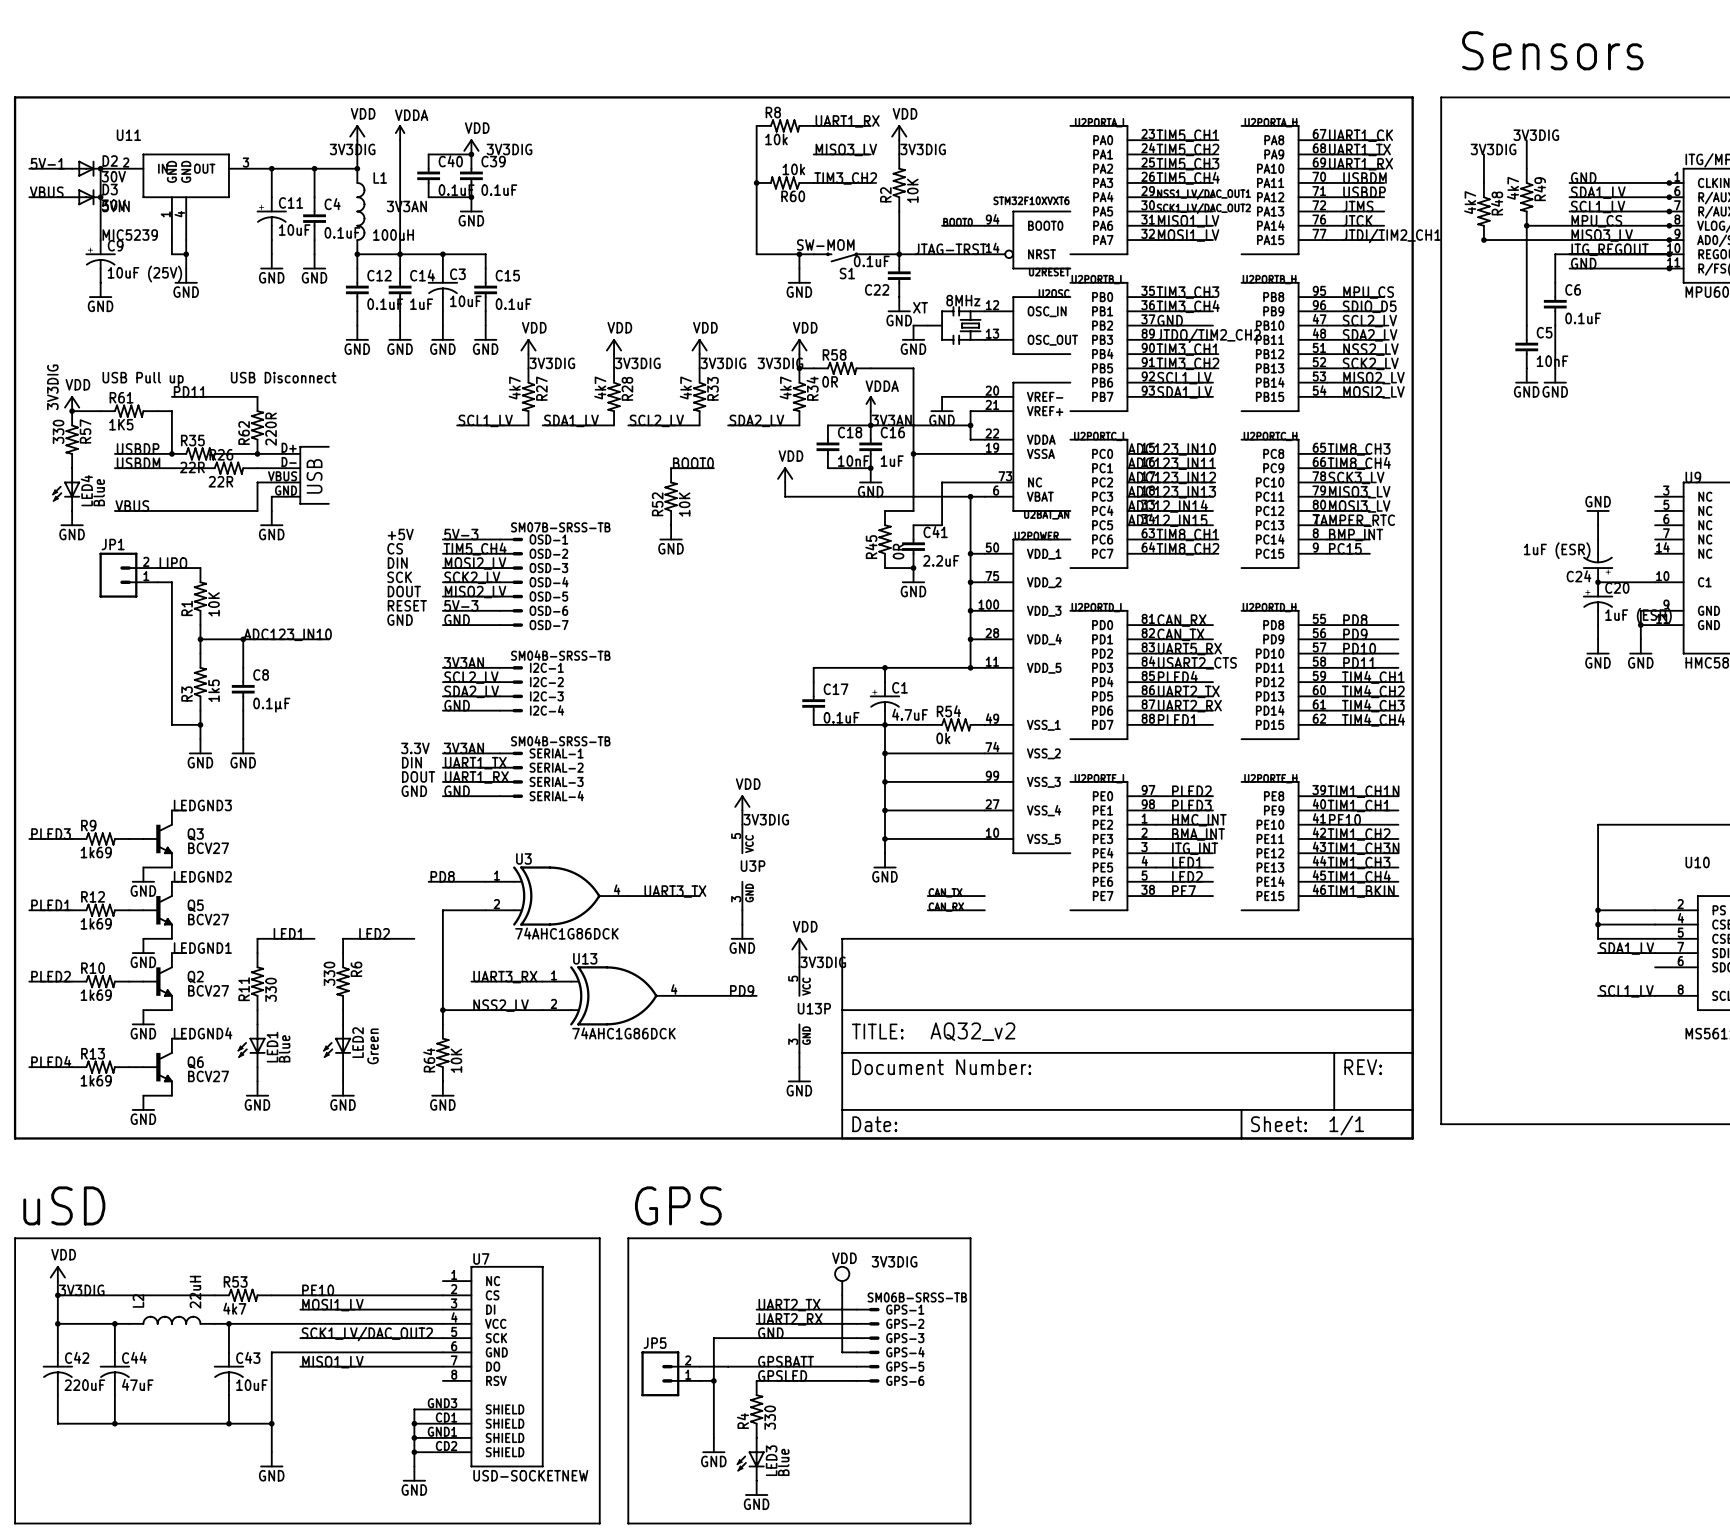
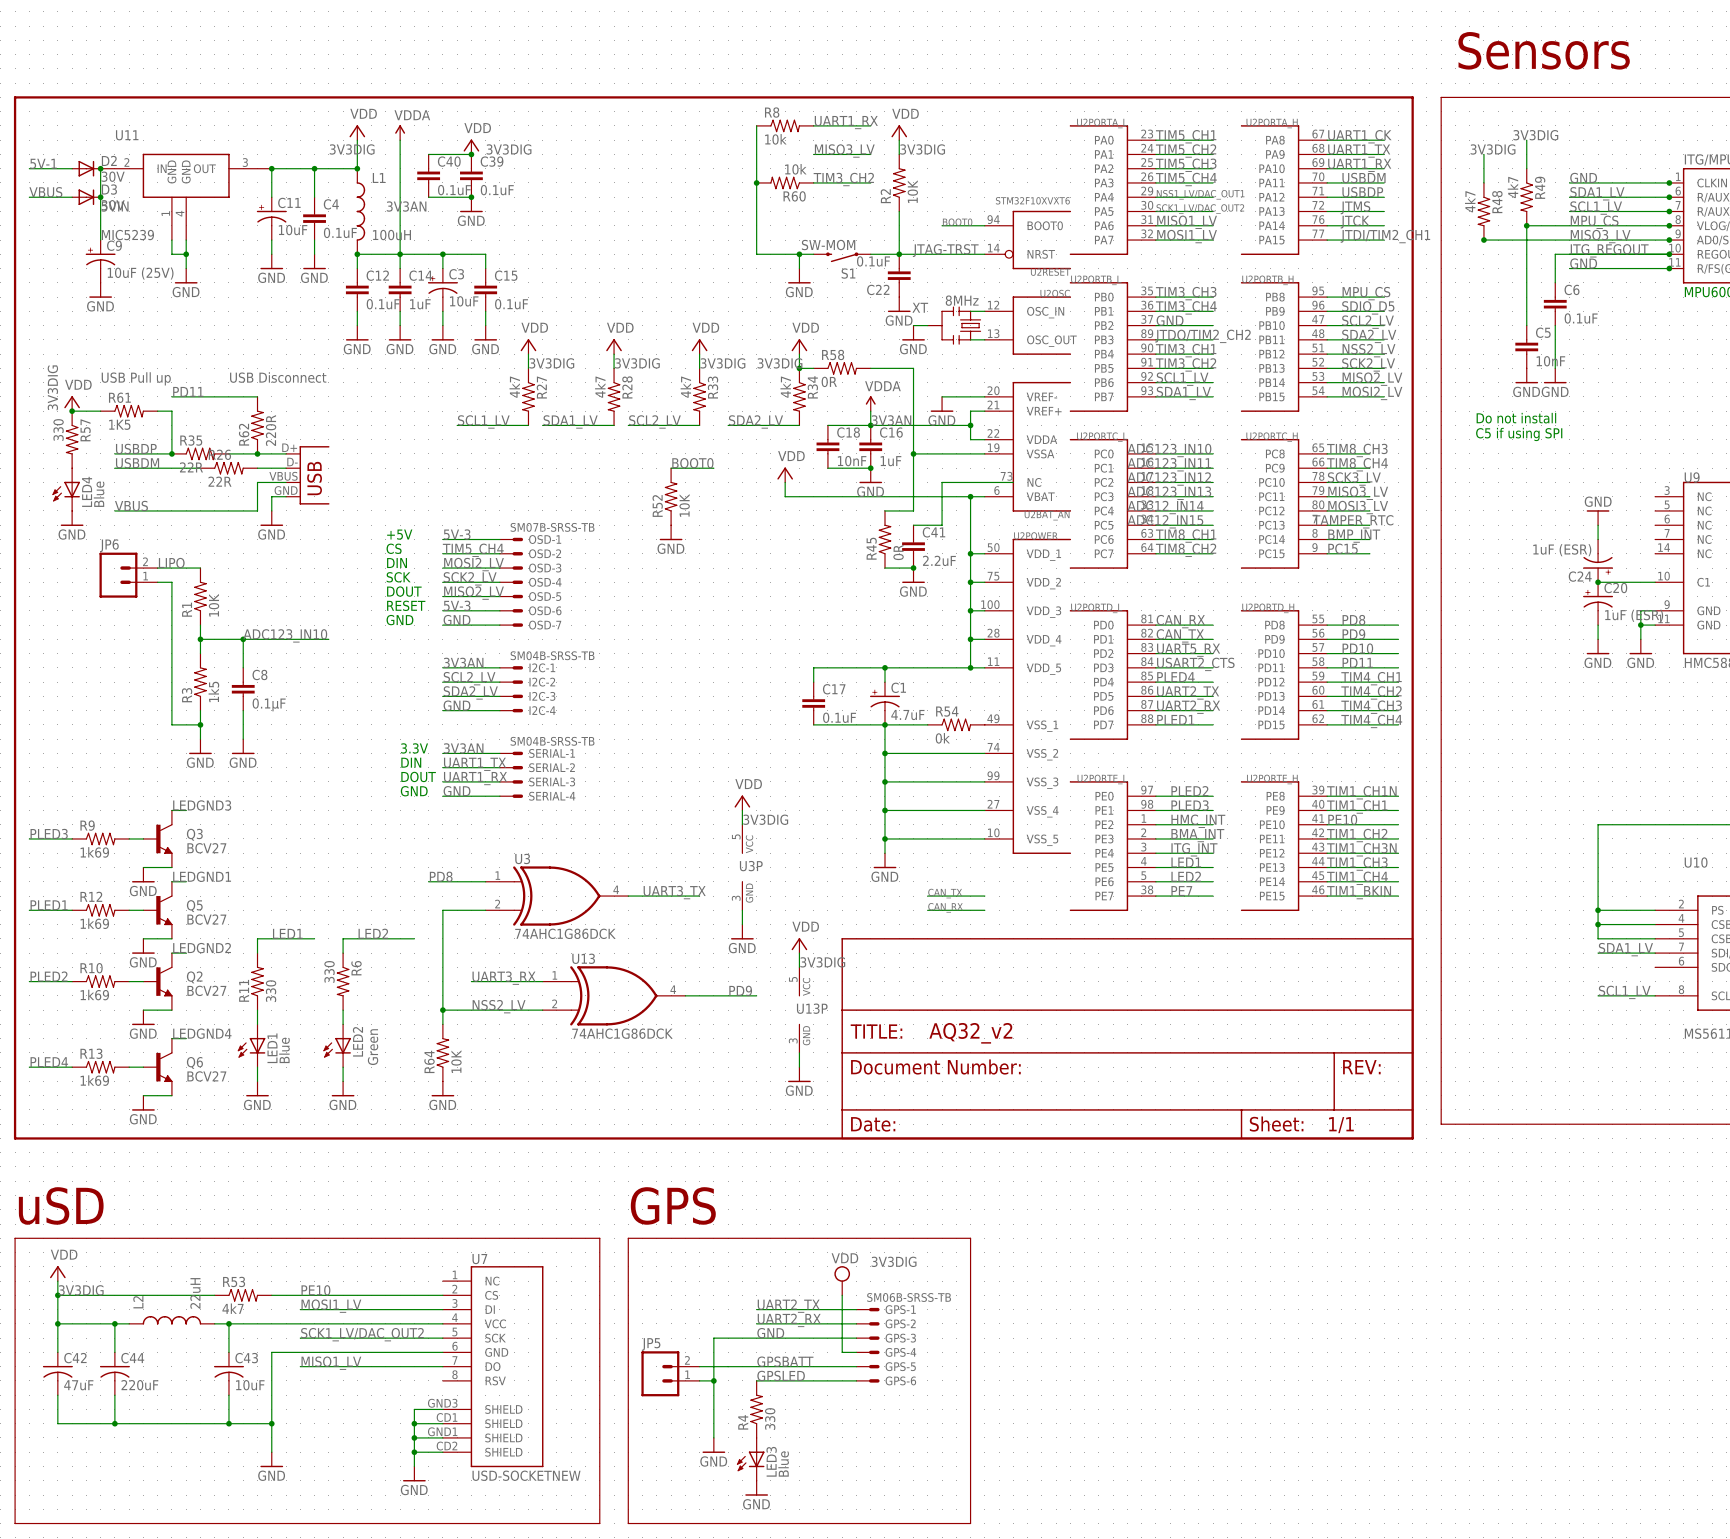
text: none -> Do not install (1516, 418)
text: none -> C5 if using SPI (1519, 434)
JP1 name: JP1 (113, 544) -> JP6 (109, 545)
label: LEDGND2 (202, 876) -> LEDGND1 (202, 876)
label: LEDGND1 (202, 948) -> LEDGND2 (202, 948)
C44 value: 47uF (137, 1384) -> 220uF (139, 1385)
C42 value: 220uF (84, 1385) -> 47uF (78, 1385)

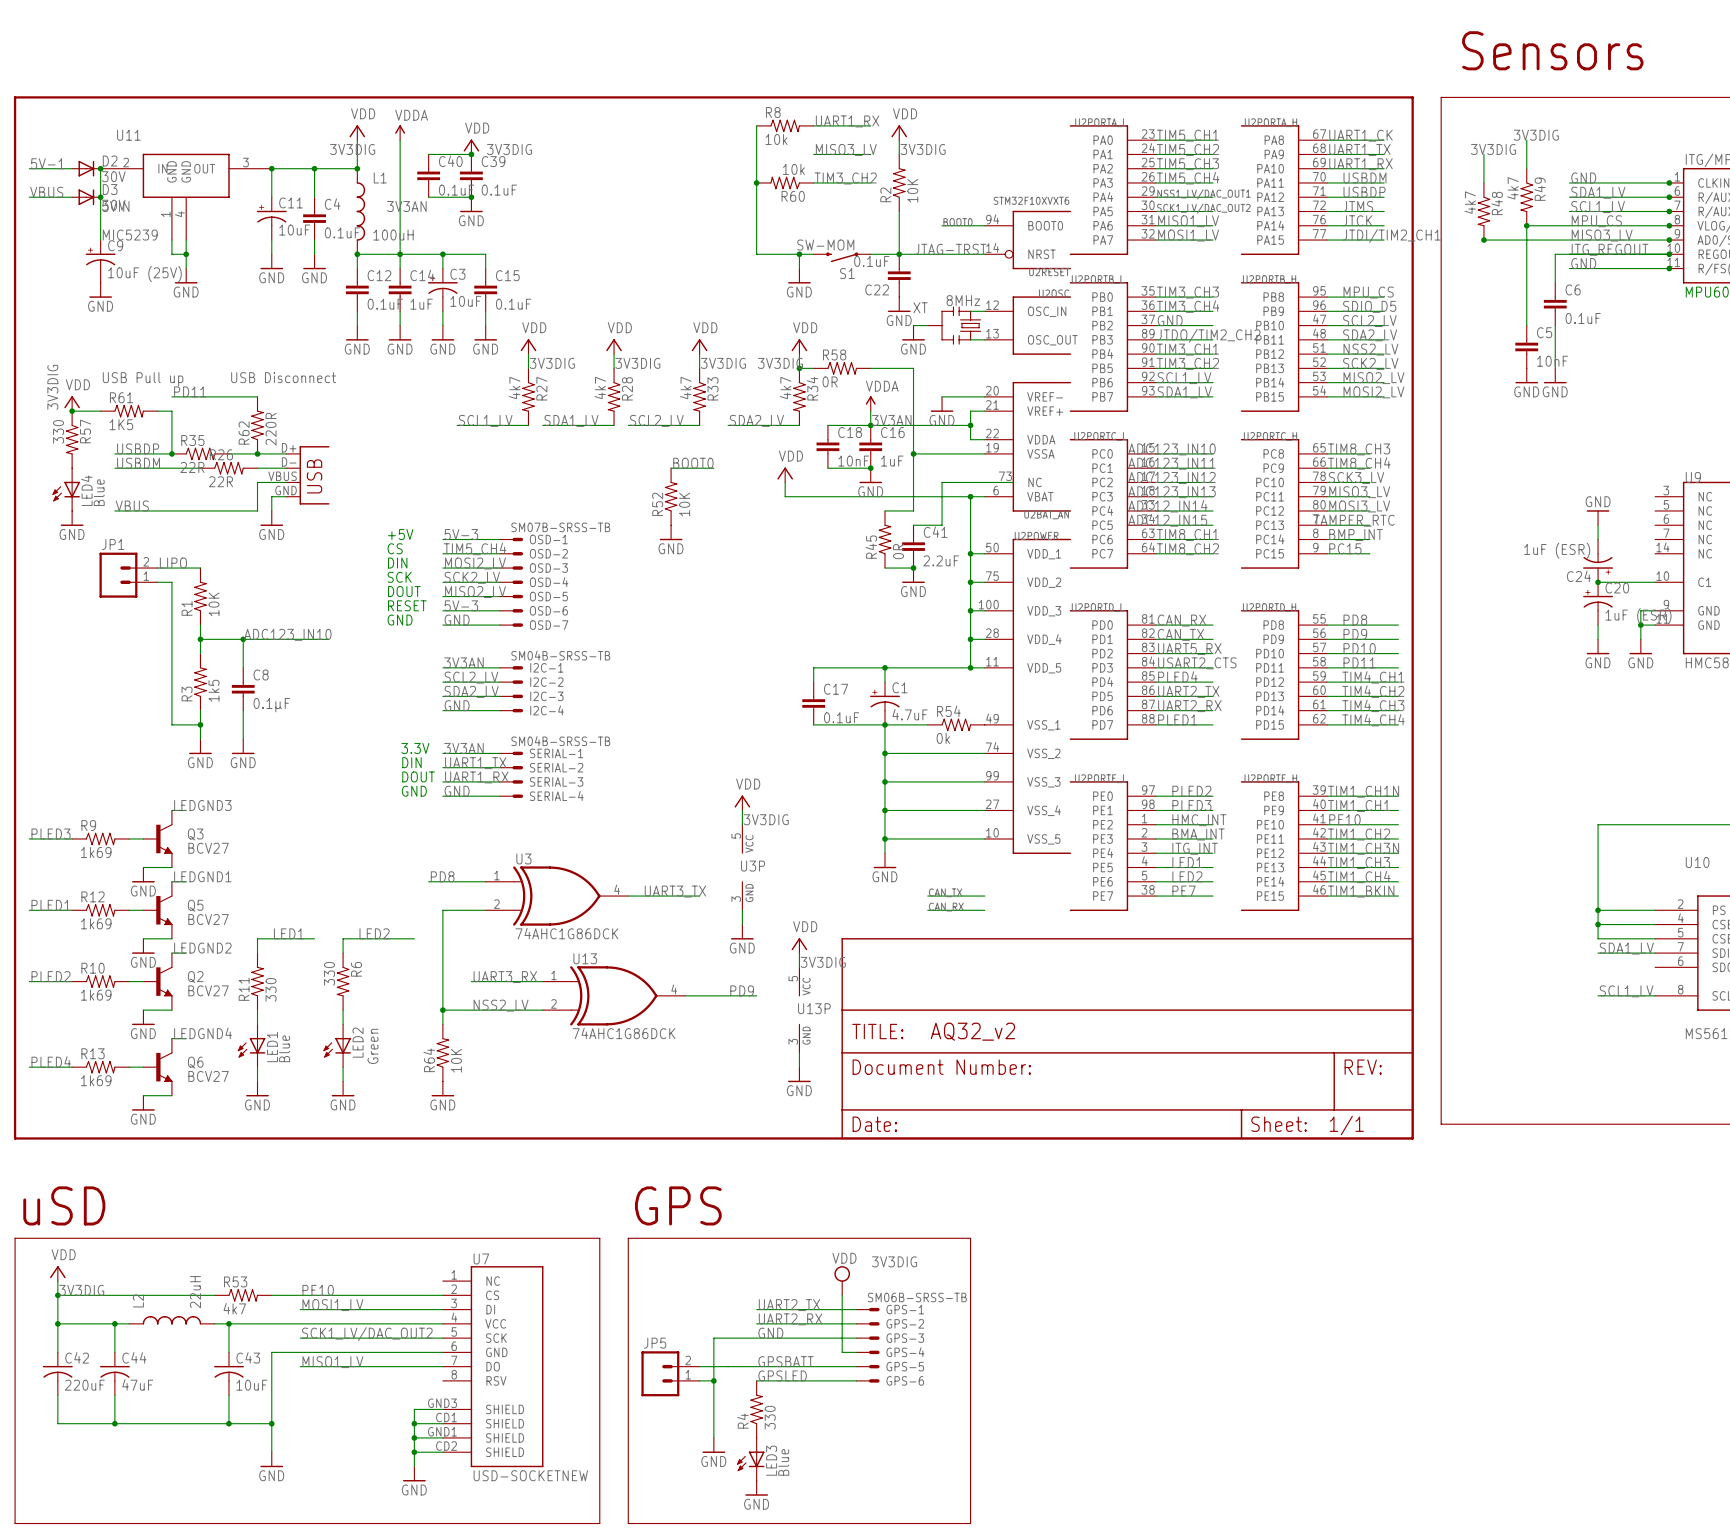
text: Do not install (1516, 418) -> none
text: C5 if using SPI (1519, 434) -> none
JP6 name: JP6 (109, 545) -> JP1 (113, 544)
C42 value: 47uF (78, 1385) -> 220uF (84, 1385)
C44 value: 220uF (139, 1385) -> 47uF (137, 1384)

